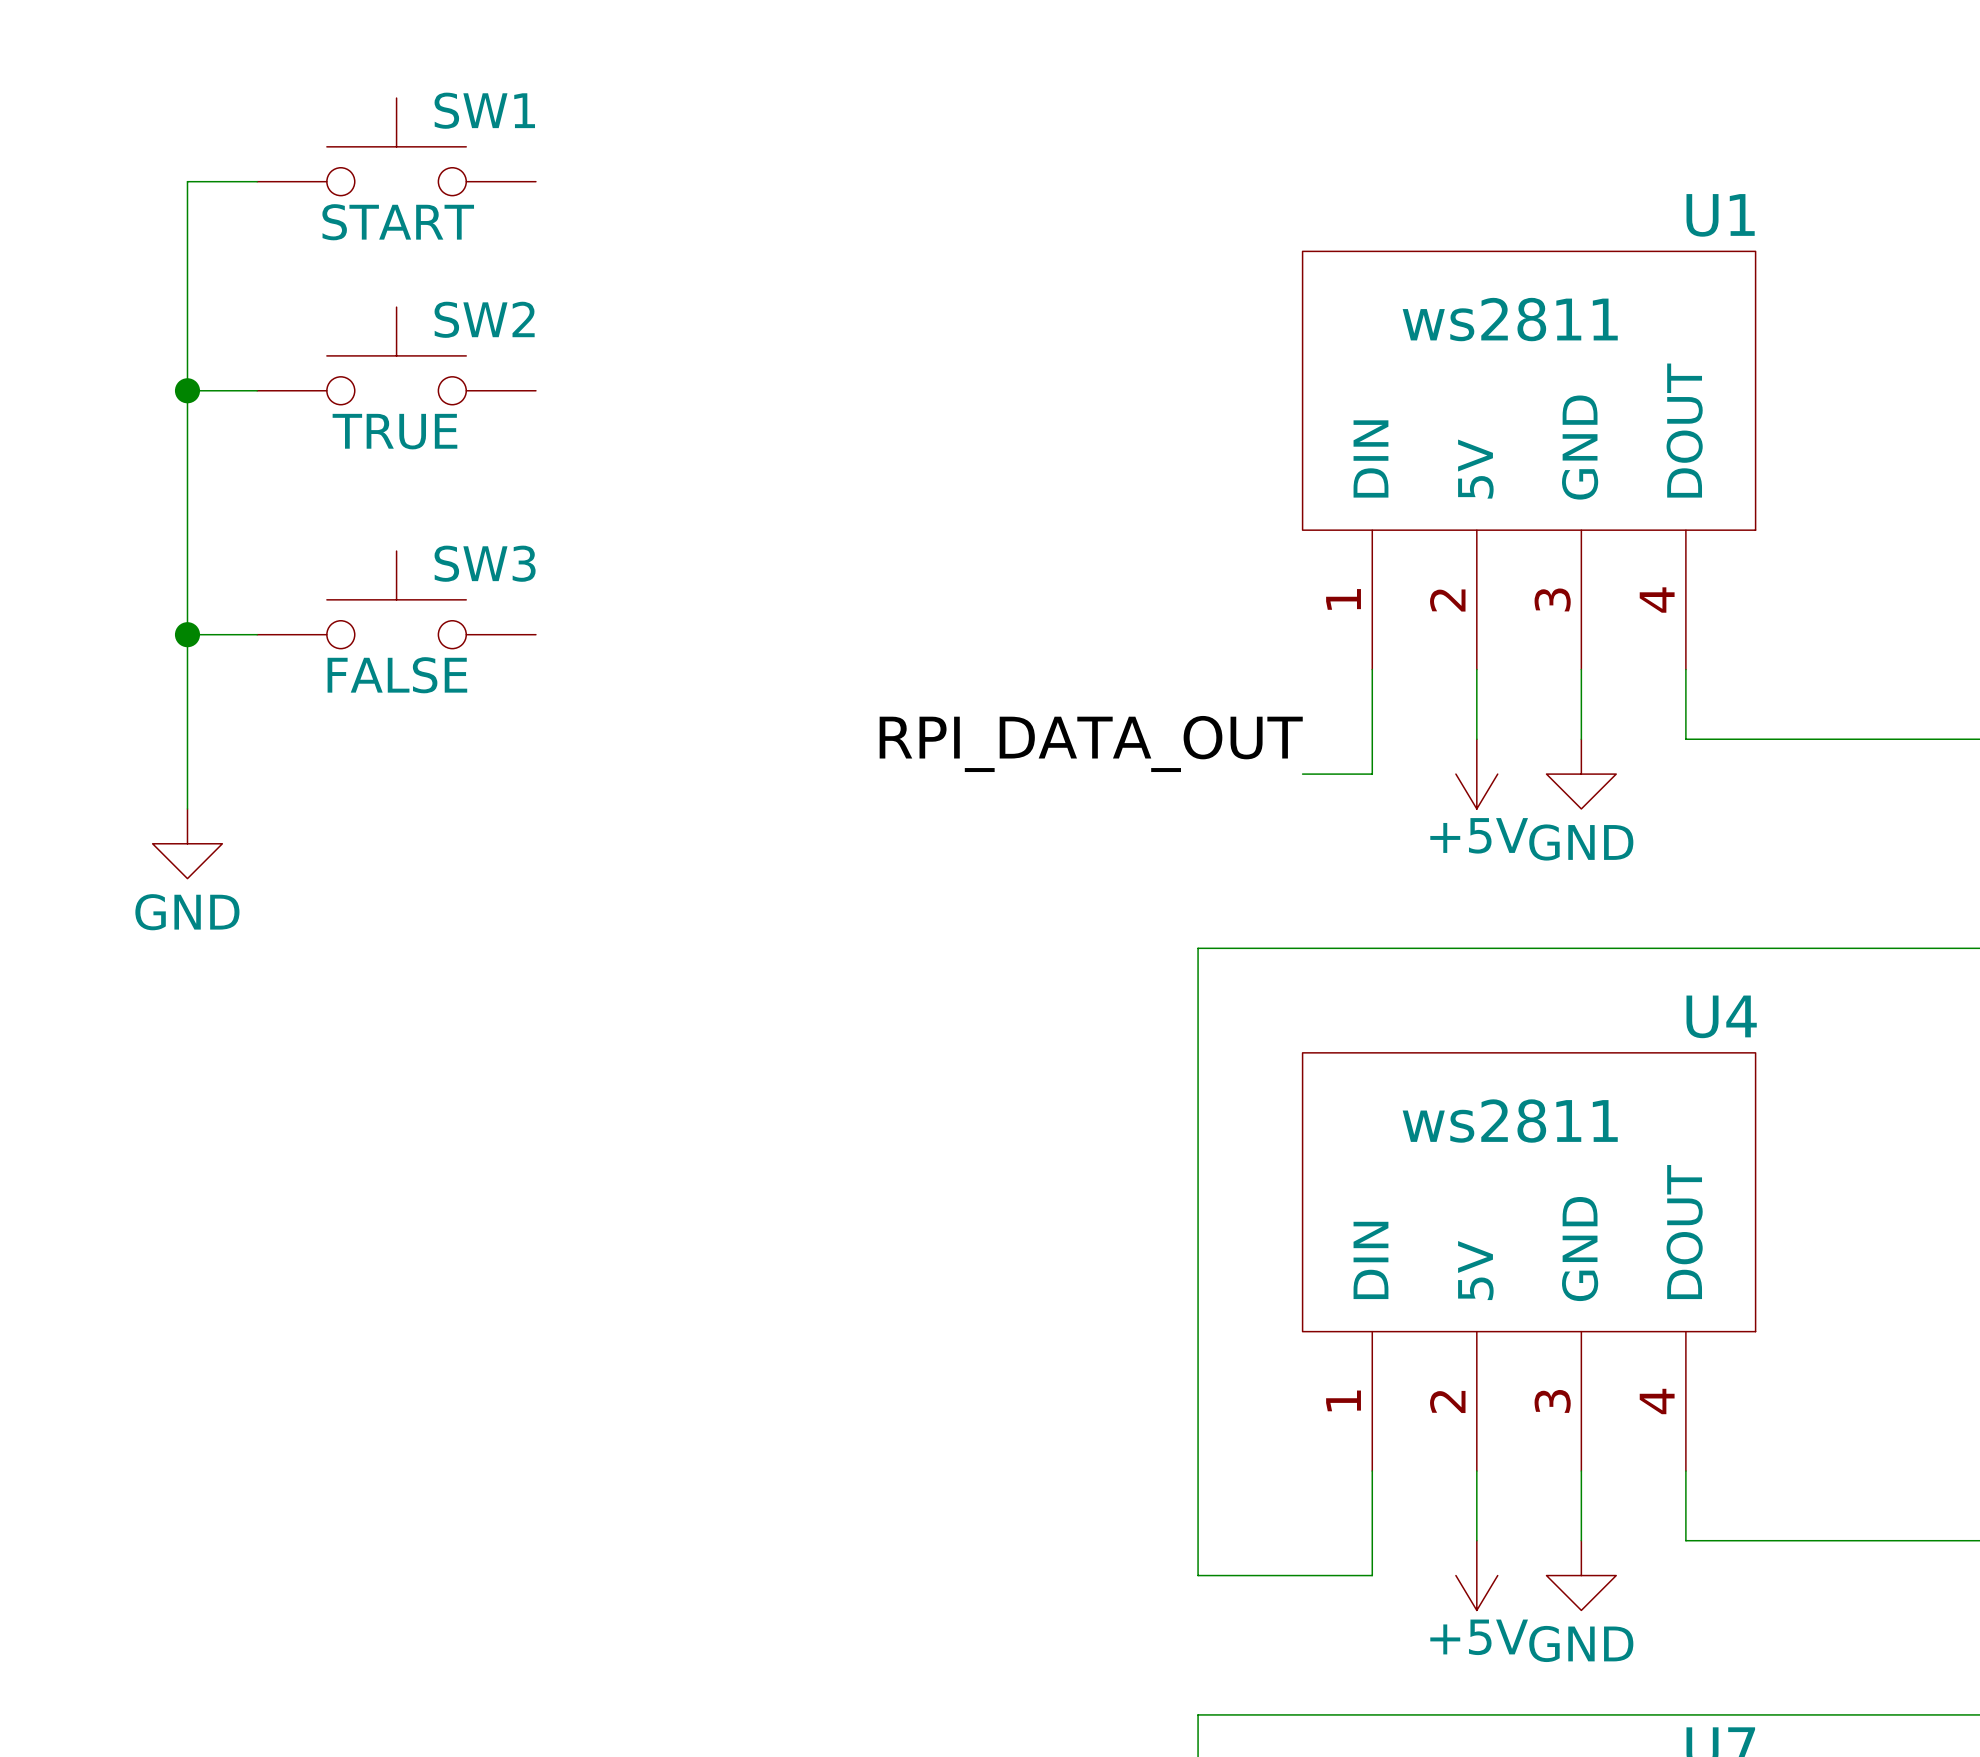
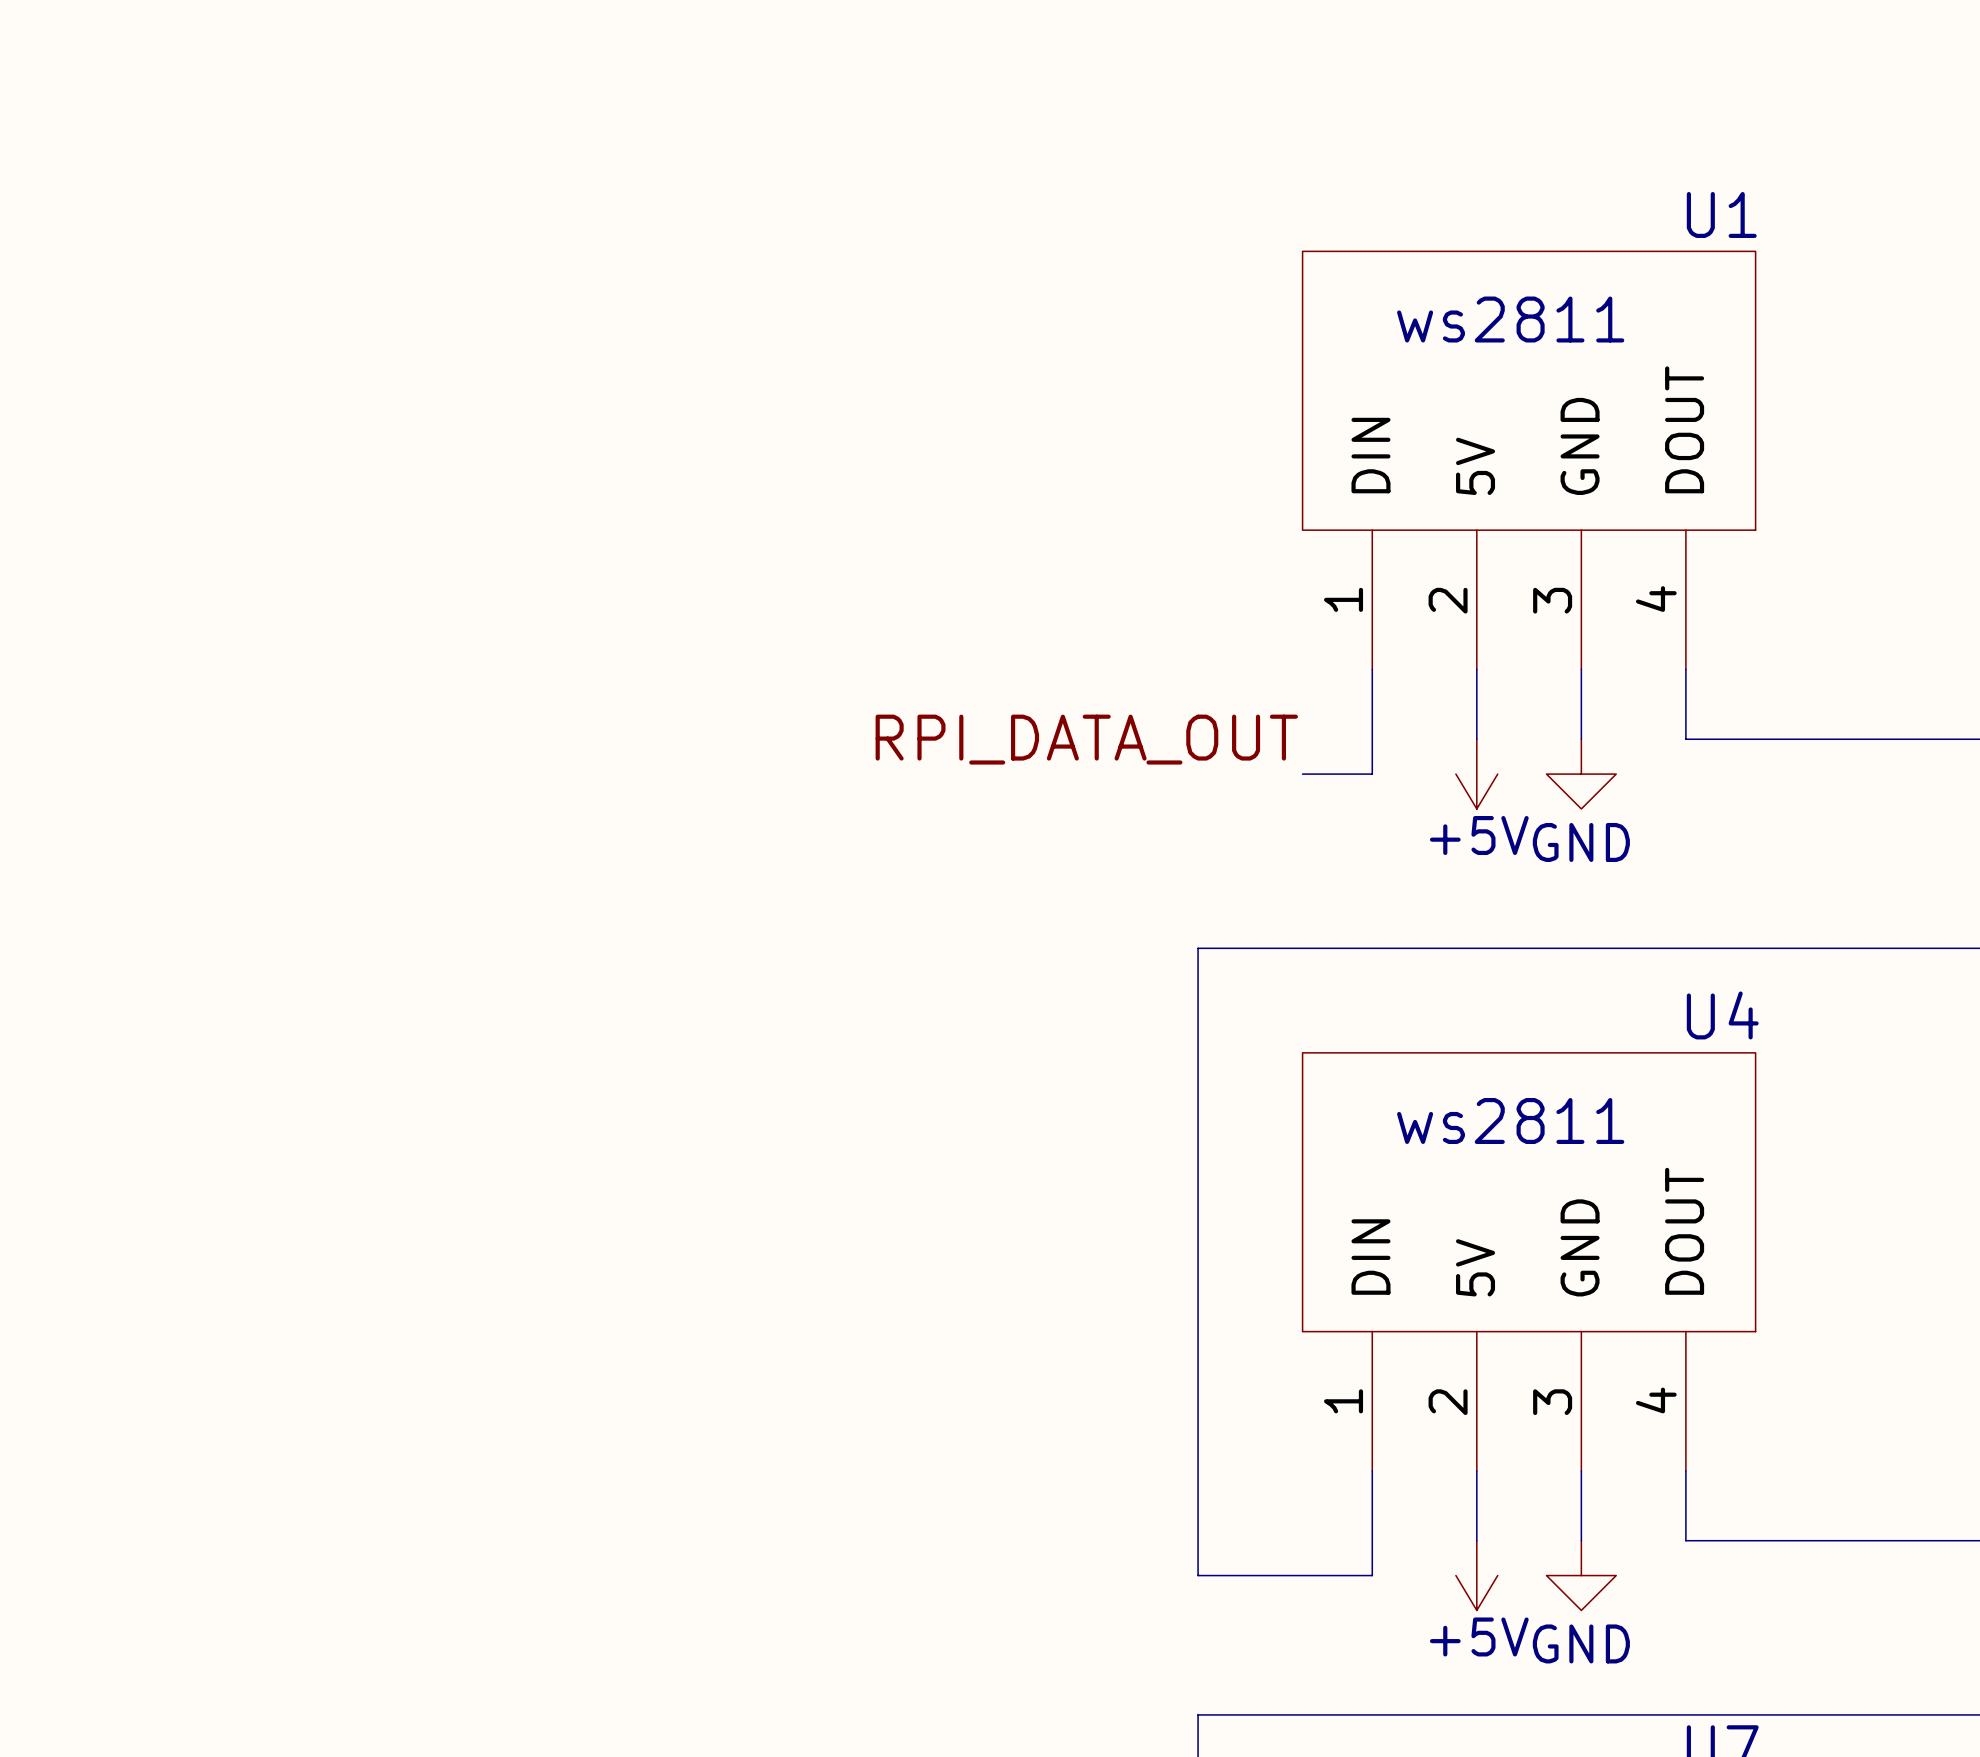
SW1: START (396, 146) -> none
wire: (257, 181) (187, 181) (187, 808) -> none
SW2: TRUE (396, 355) -> none
wire: (187, 390) (257, 390) -> none
junction: (187, 390) -> none
SW3: FALSE (396, 599) -> none
wire: (187, 634) (257, 634) -> none
junction: (187, 634) -> none
power symbol: GND (187, 843) -> none

